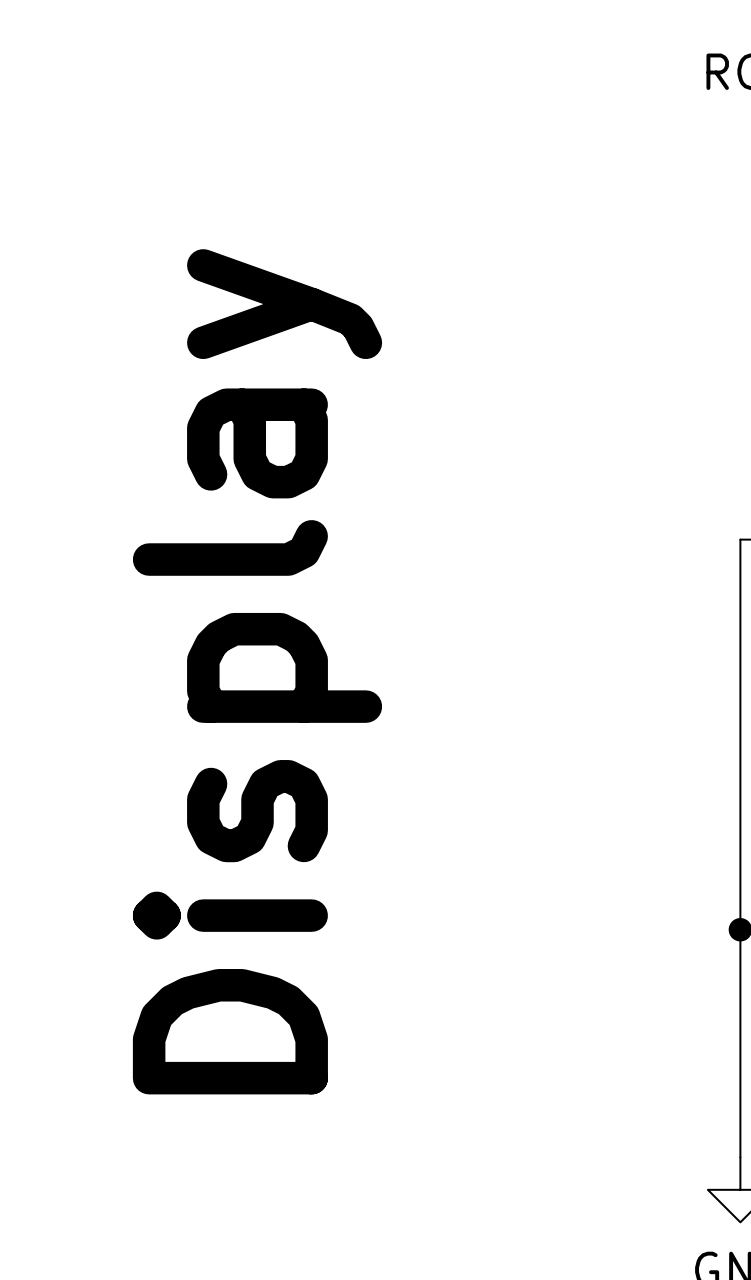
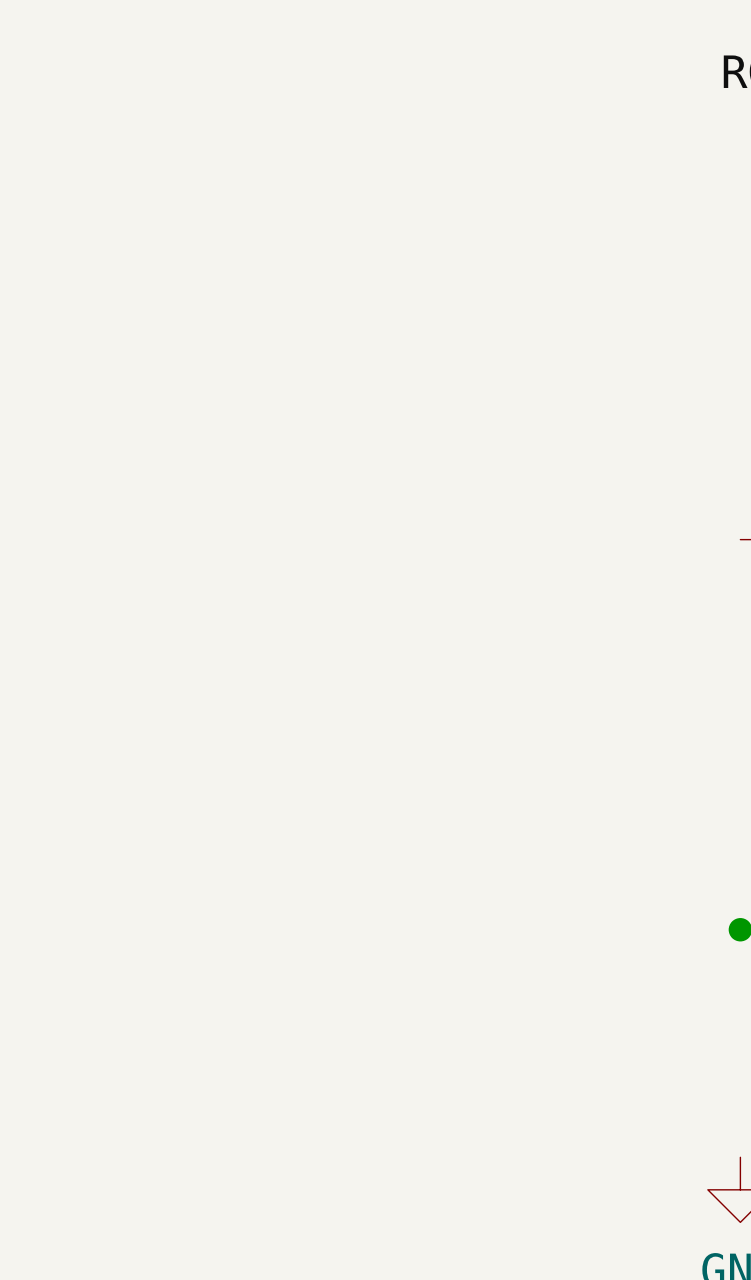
wire: (740, 539) (740, 1157) -> none
text: Display (257, 671) -> none

